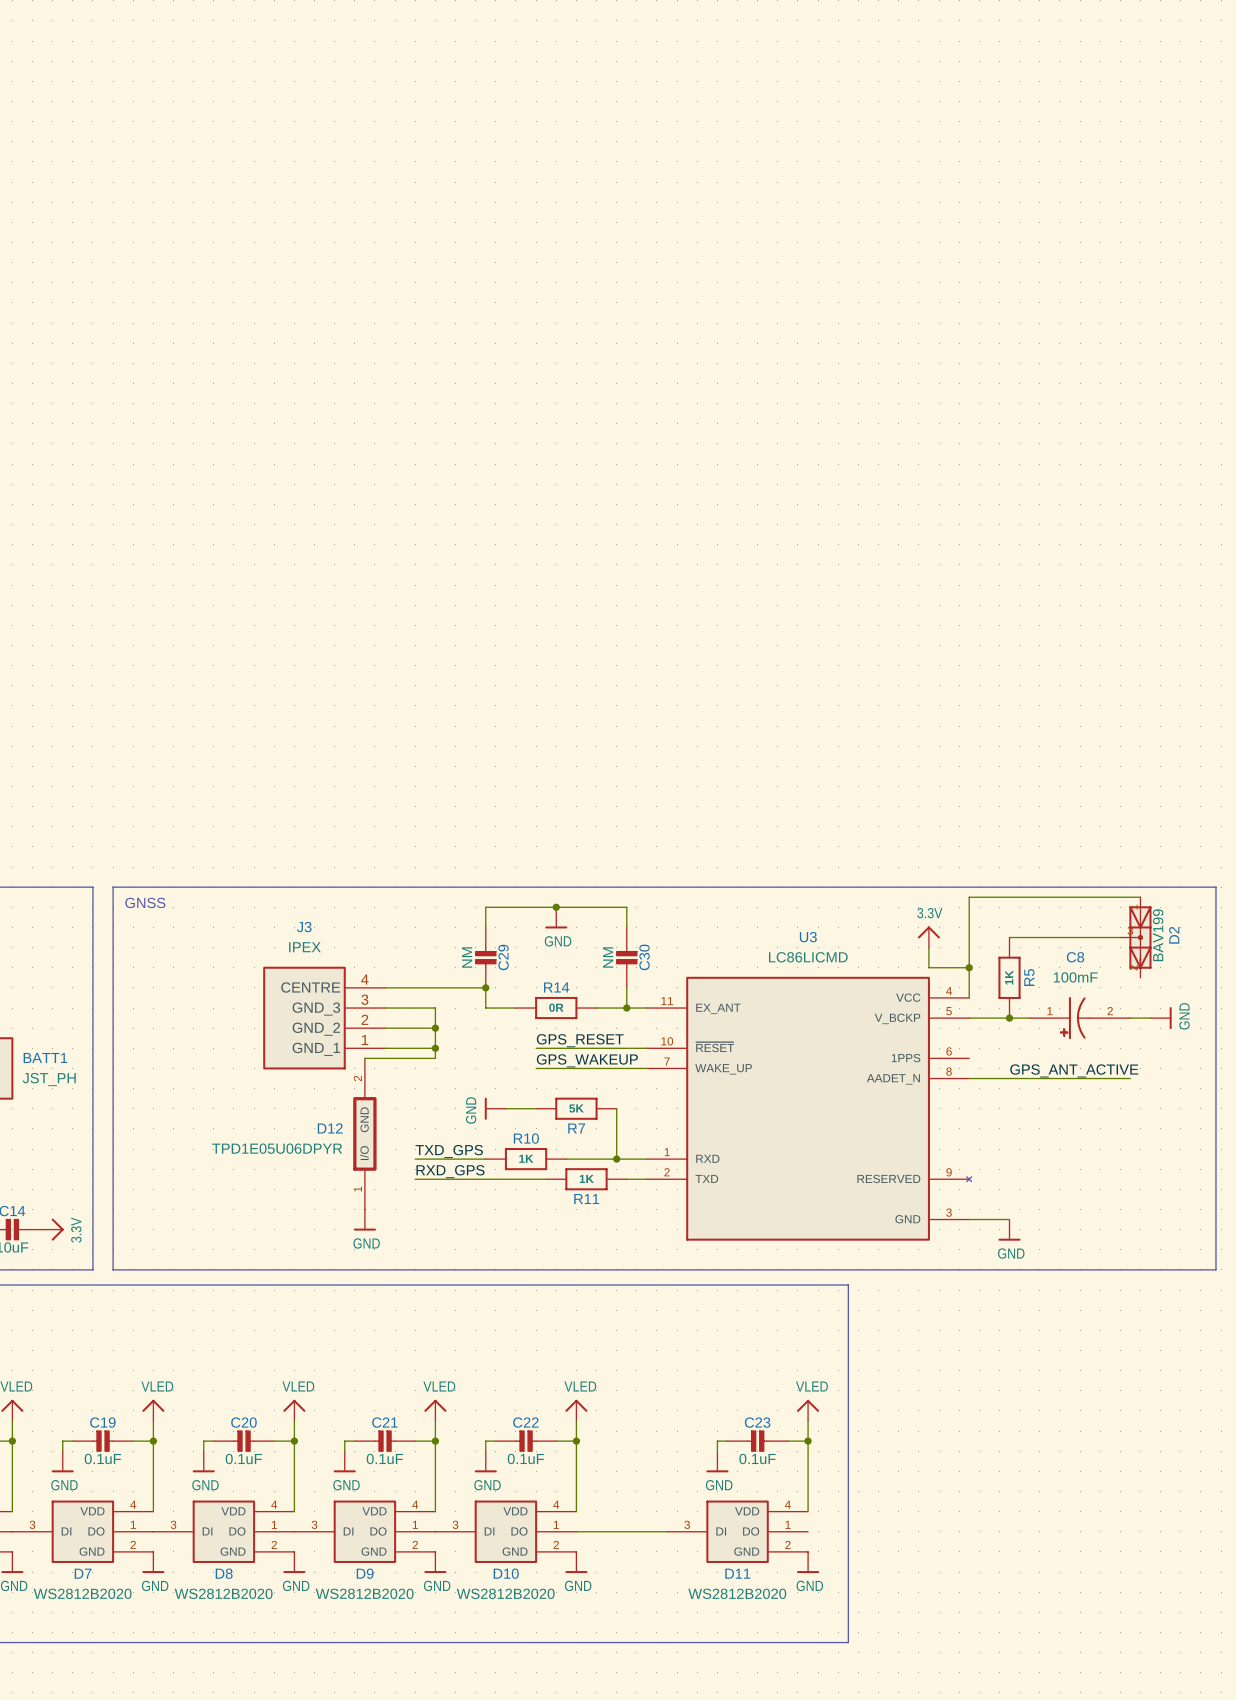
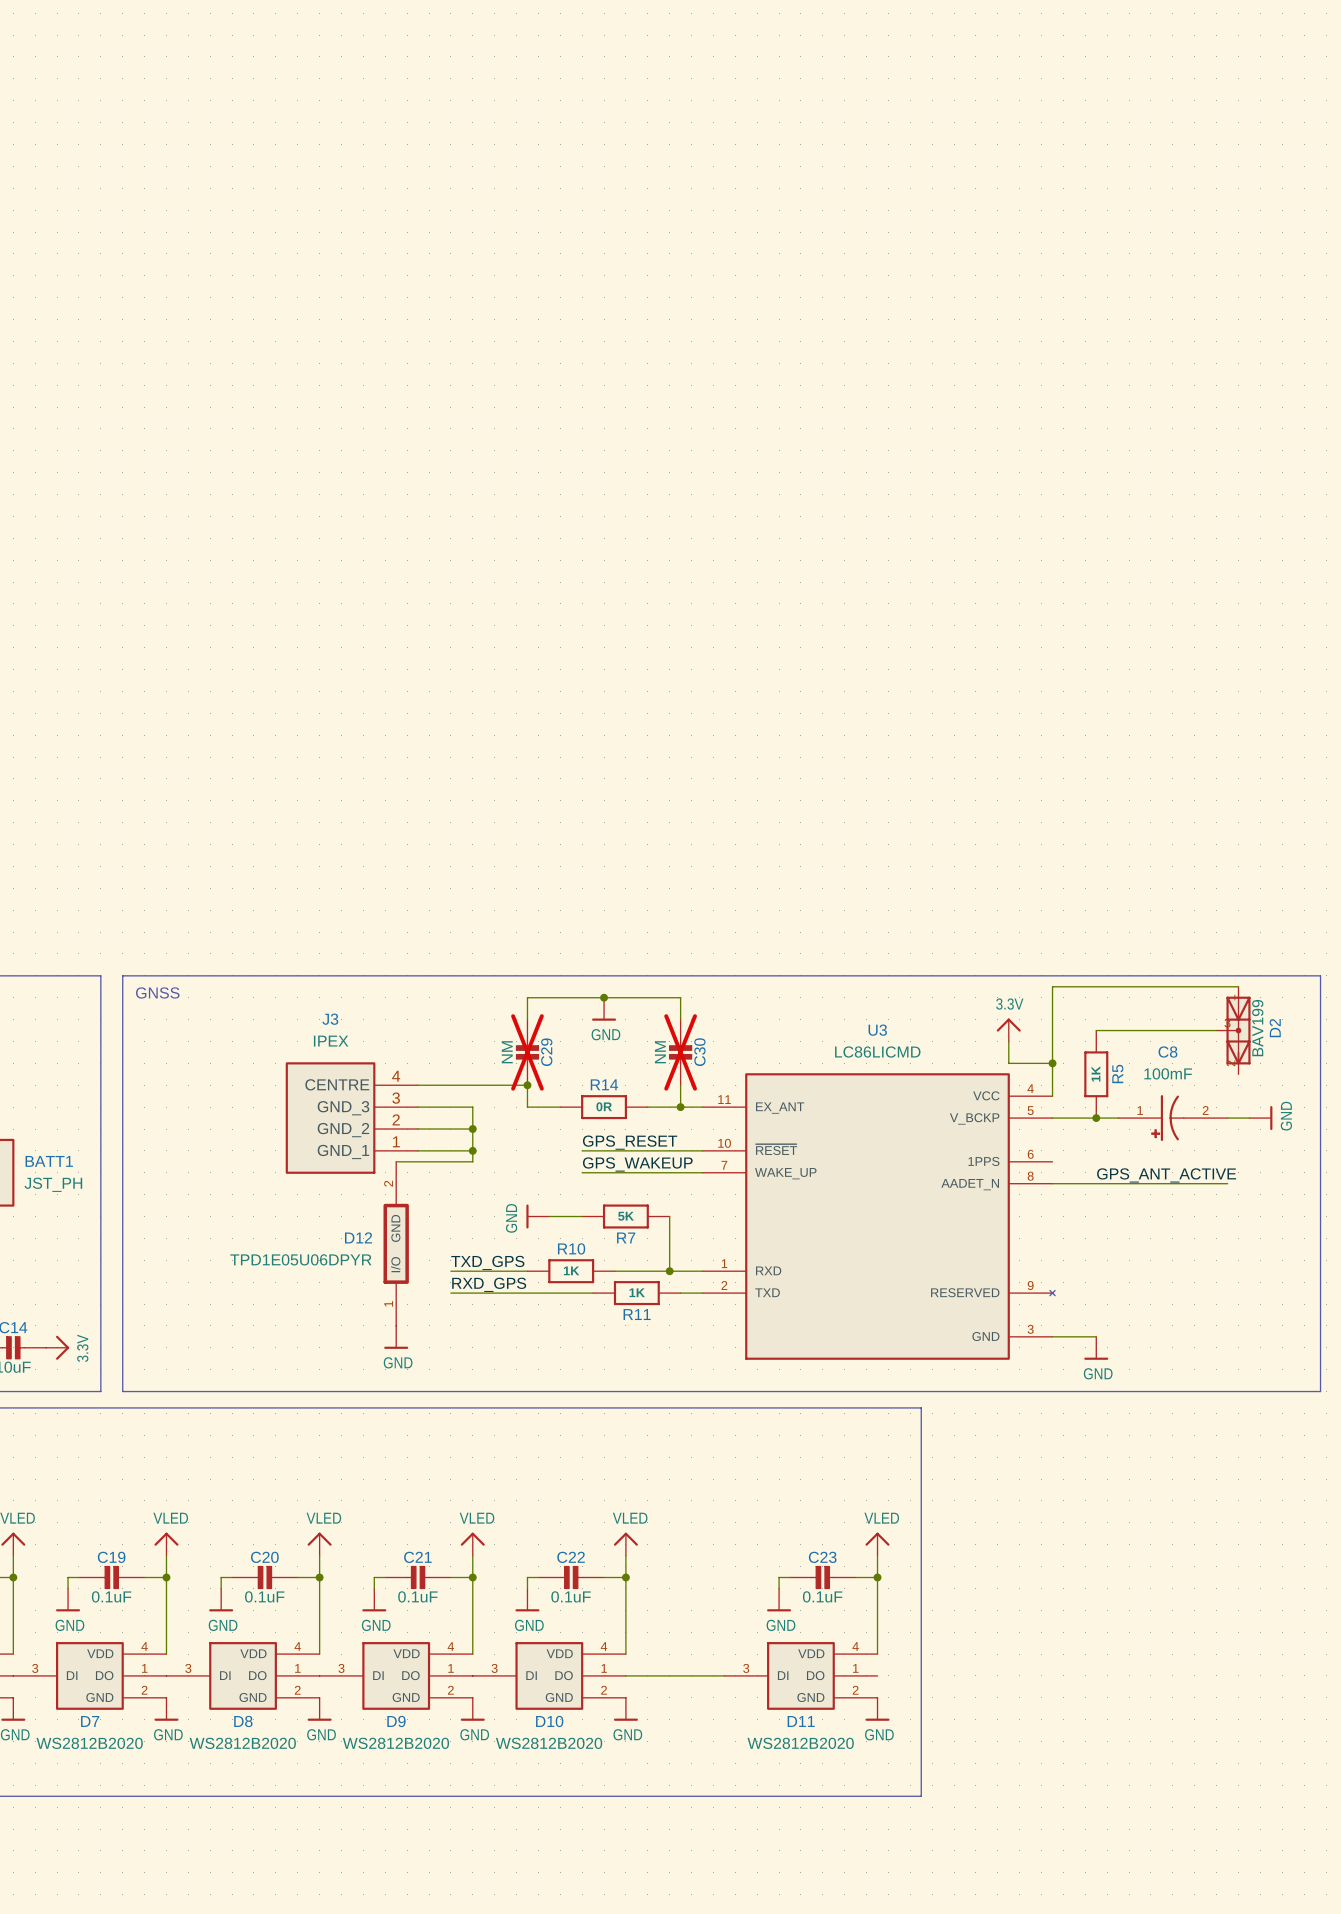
C29 do-not-place cross: none -> (527, 1052)
C30 do-not-place cross: none -> (680, 1052)

